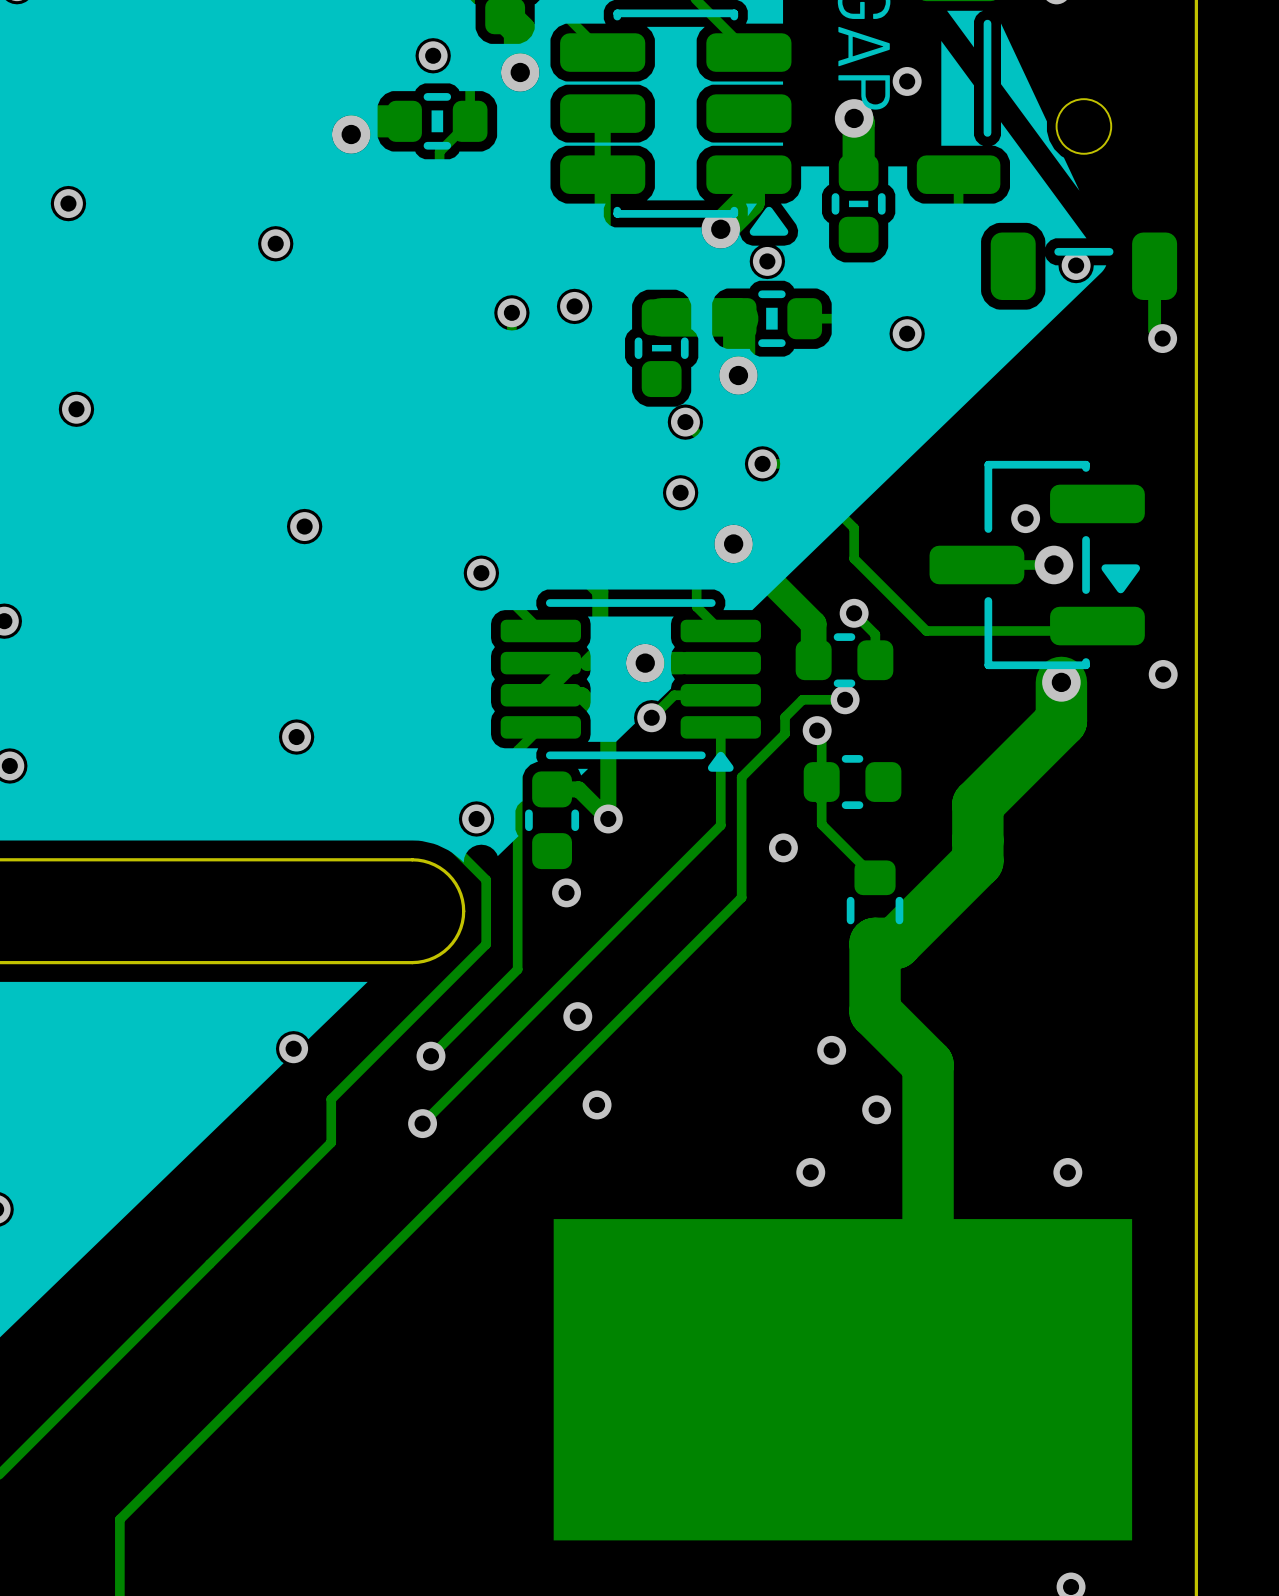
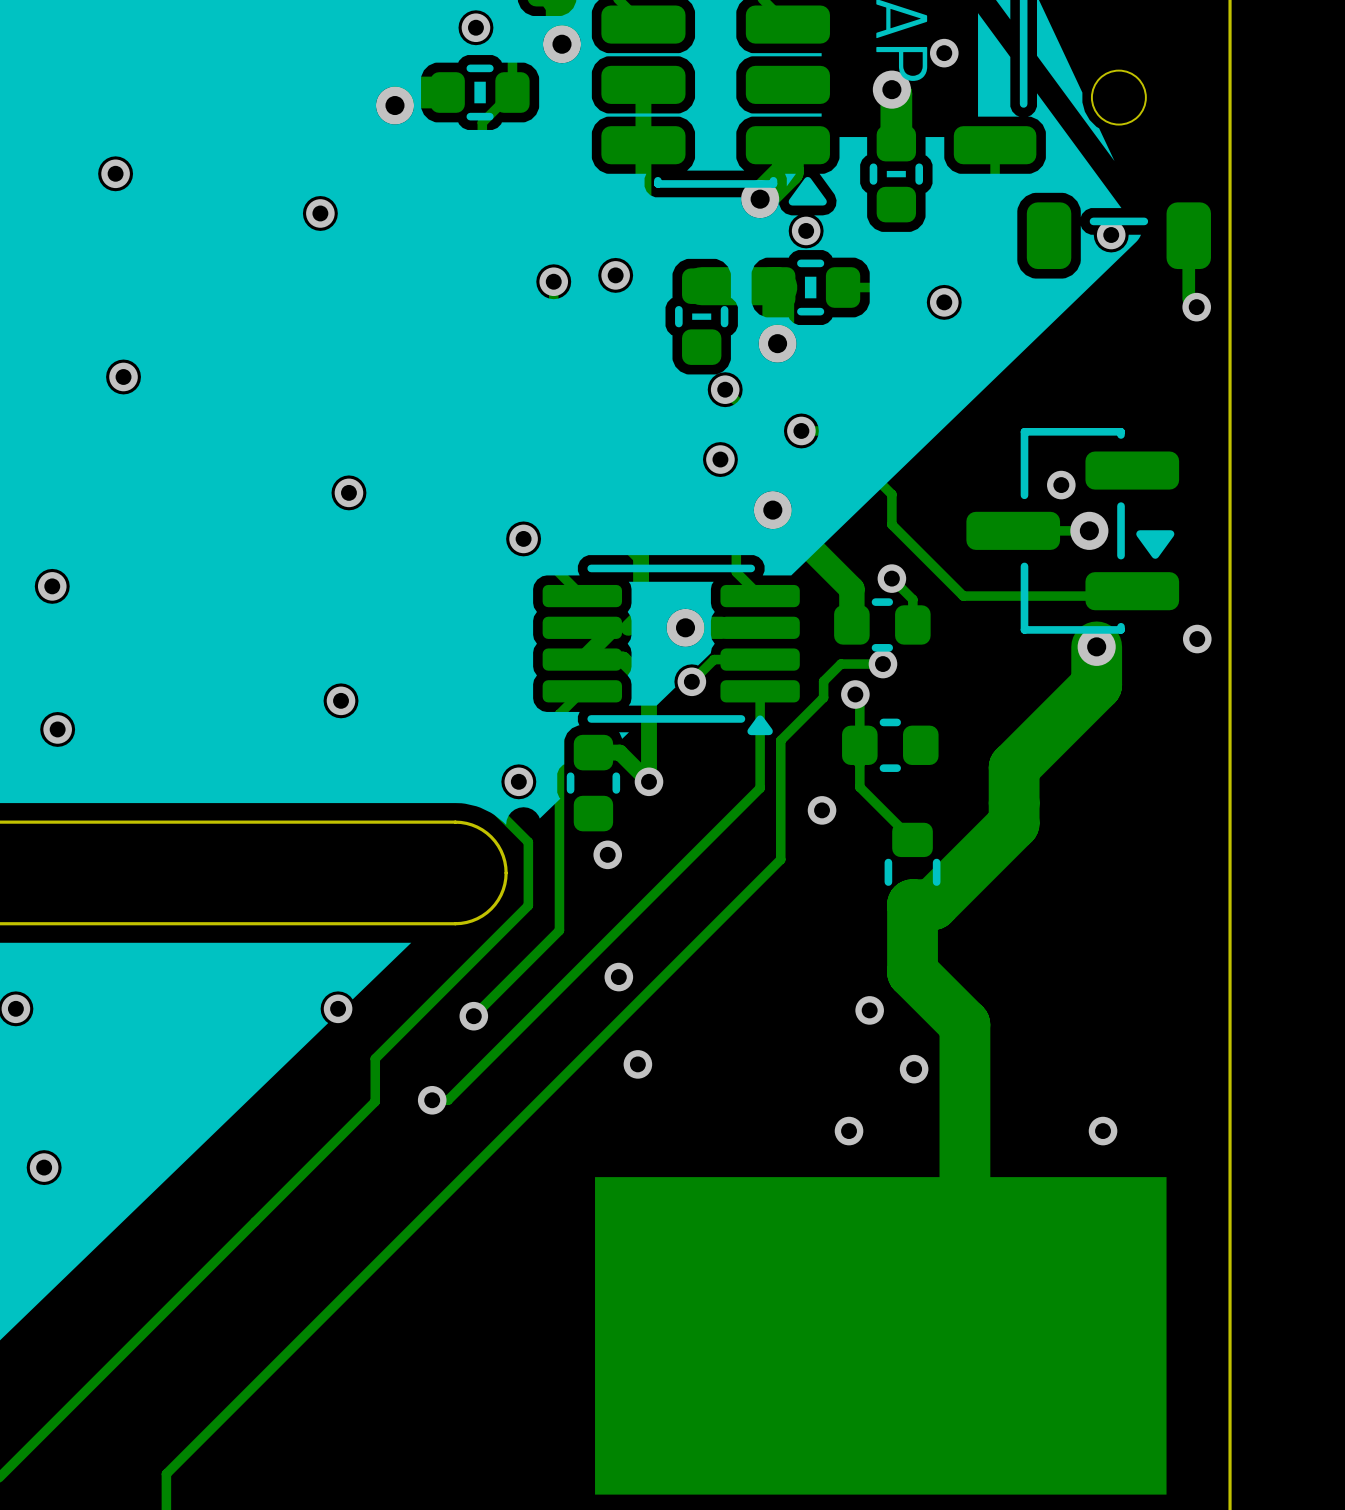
track: none -> (465, 1082) (448, 1100) (432, 1100)
via position: (422, 1123) -> (432, 1100)

